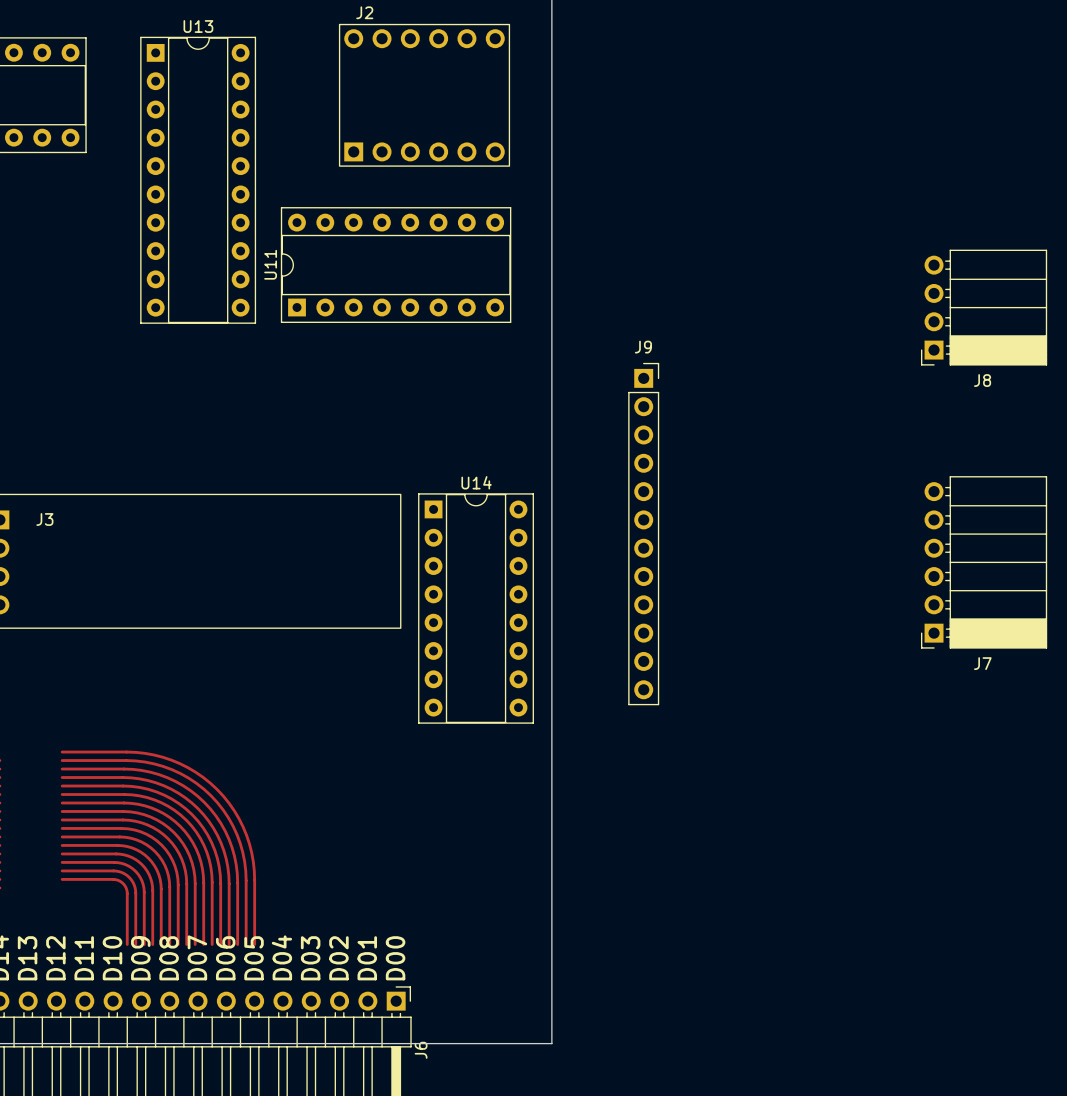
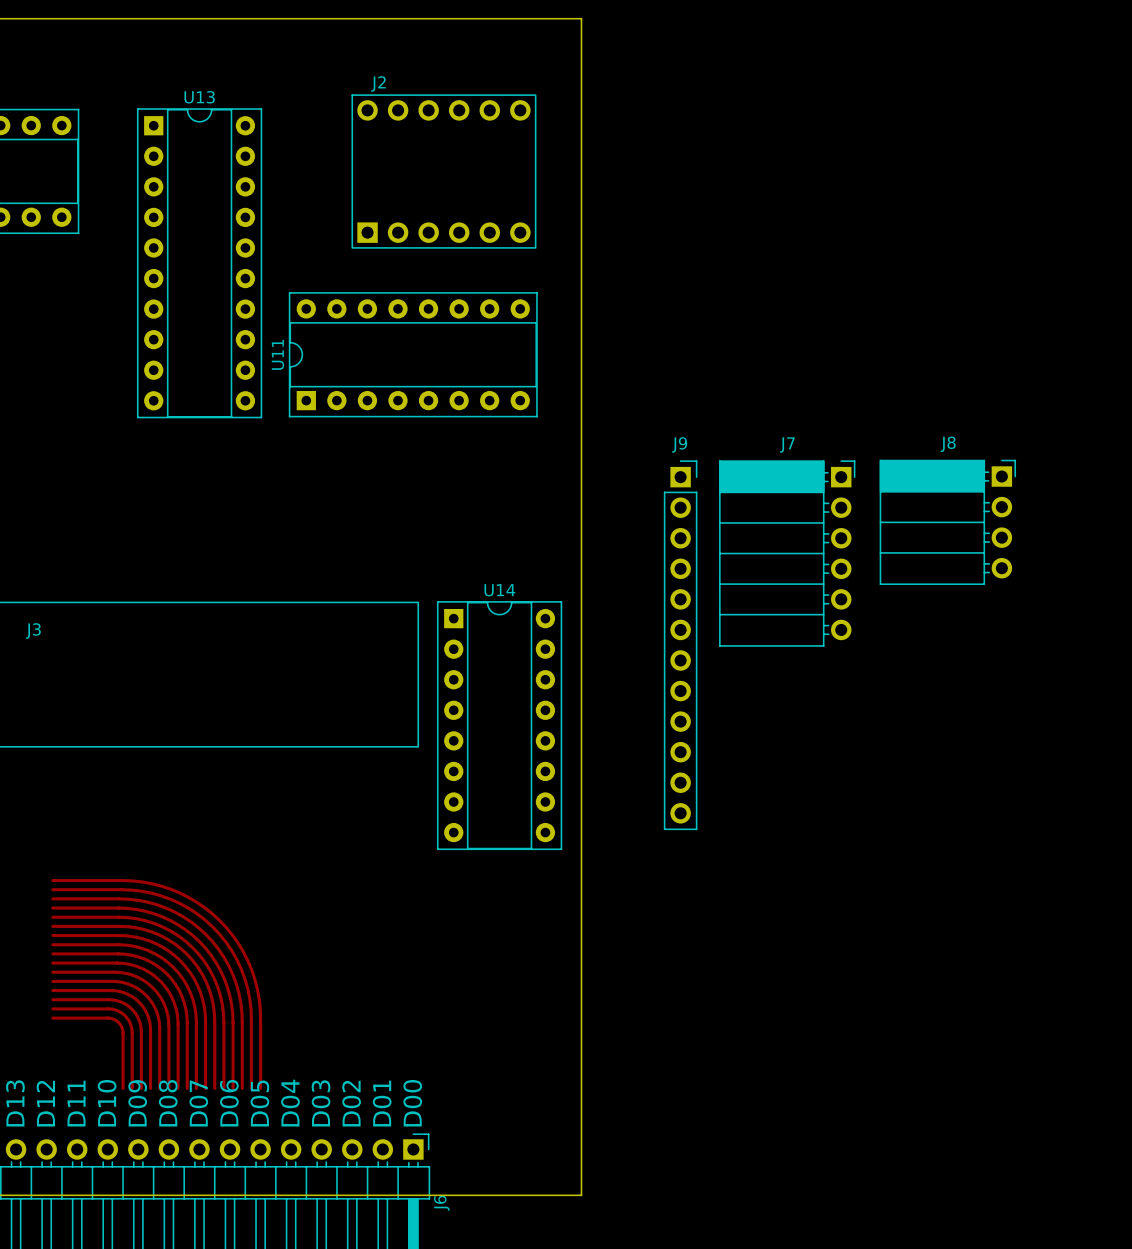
J8 rotation: 0° (984, 307) -> 180° (947, 522)
J8 position: (984, 307) -> (947, 522)
J7 rotation: 0° (984, 562) -> 180° (787, 553)
J7 position: (984, 562) -> (787, 553)

